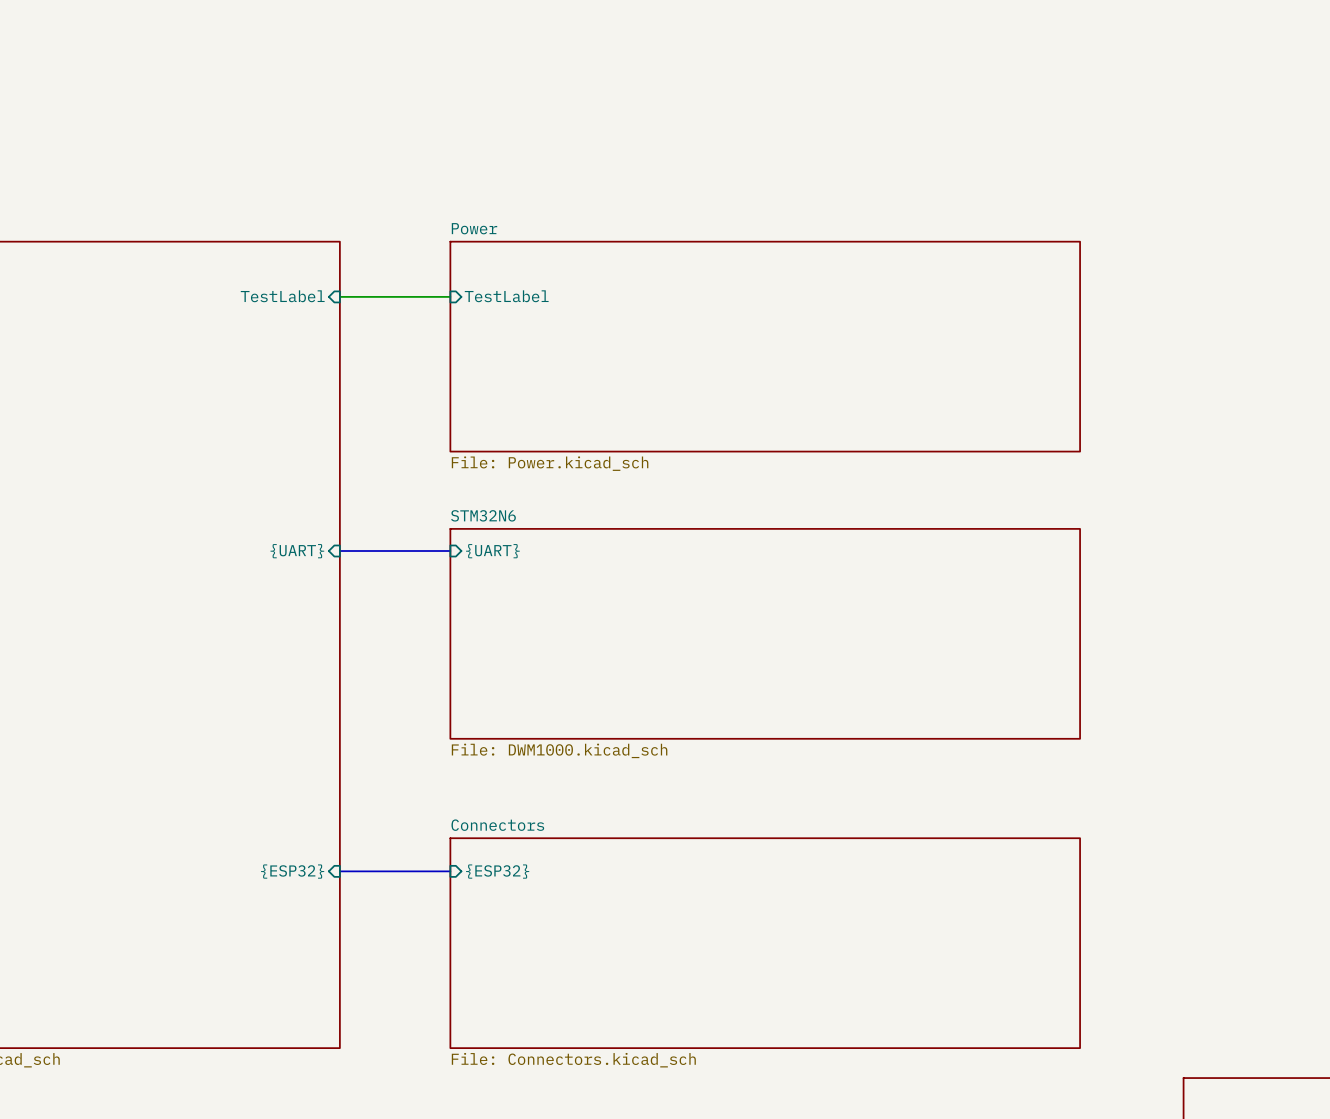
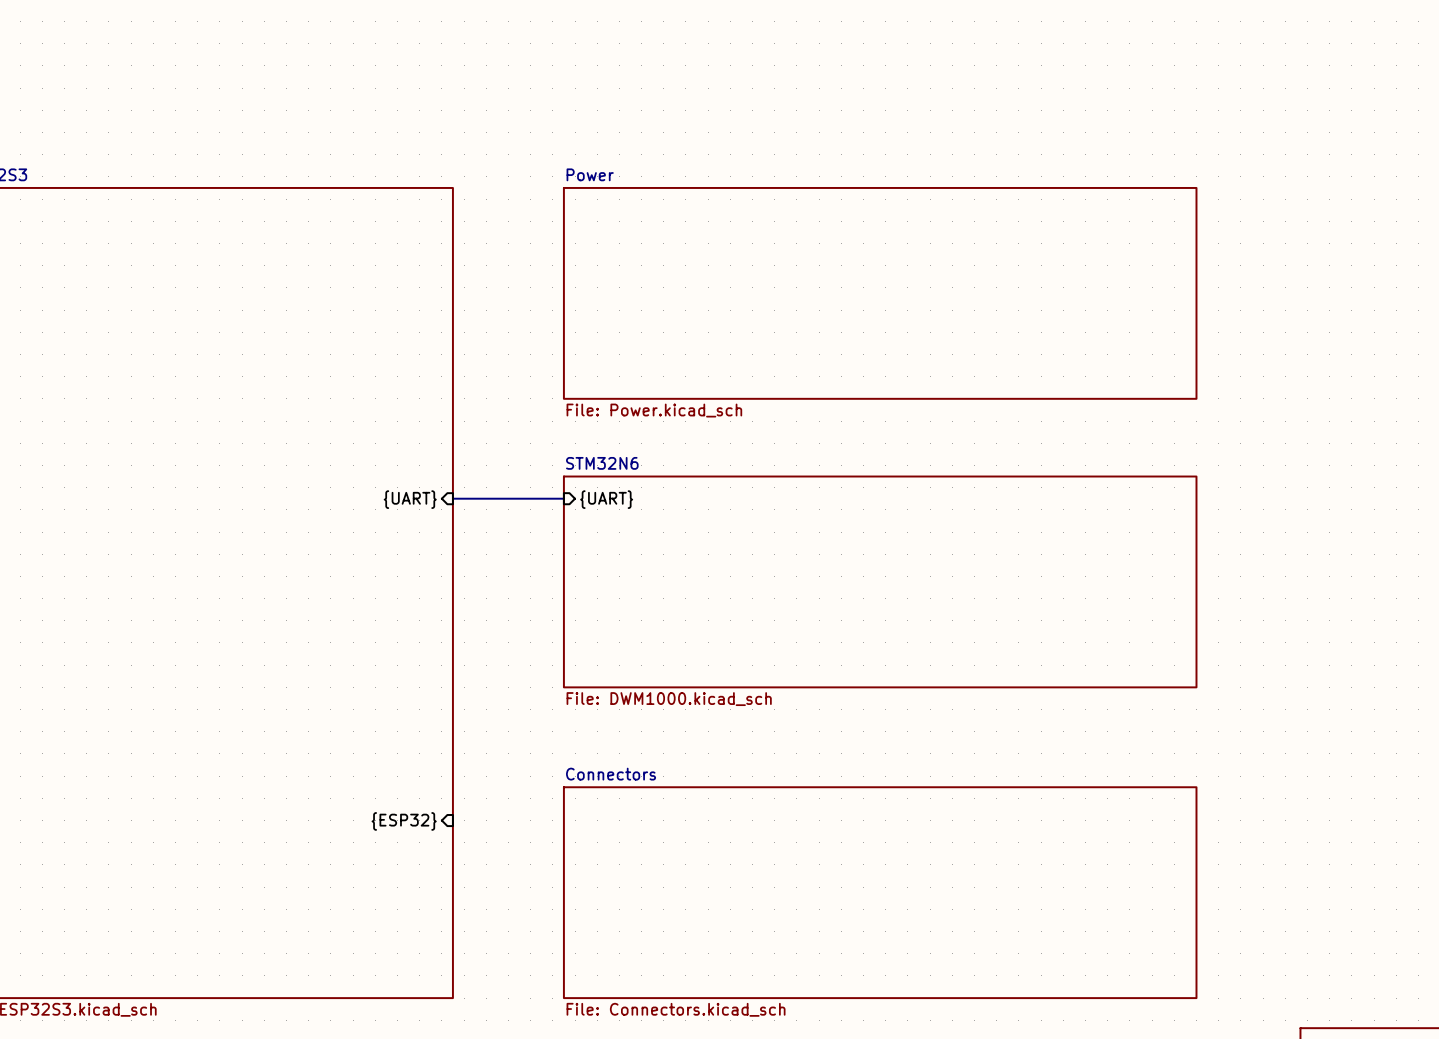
sheet pin: TestLabel (282, 296) -> none
wire: (339, 296) (450, 296) -> none
sheet pin: TestLabel (506, 296) -> none
bus: (339, 871) (450, 871) -> none
sheet pin: {ESP32} (497, 871) -> none

